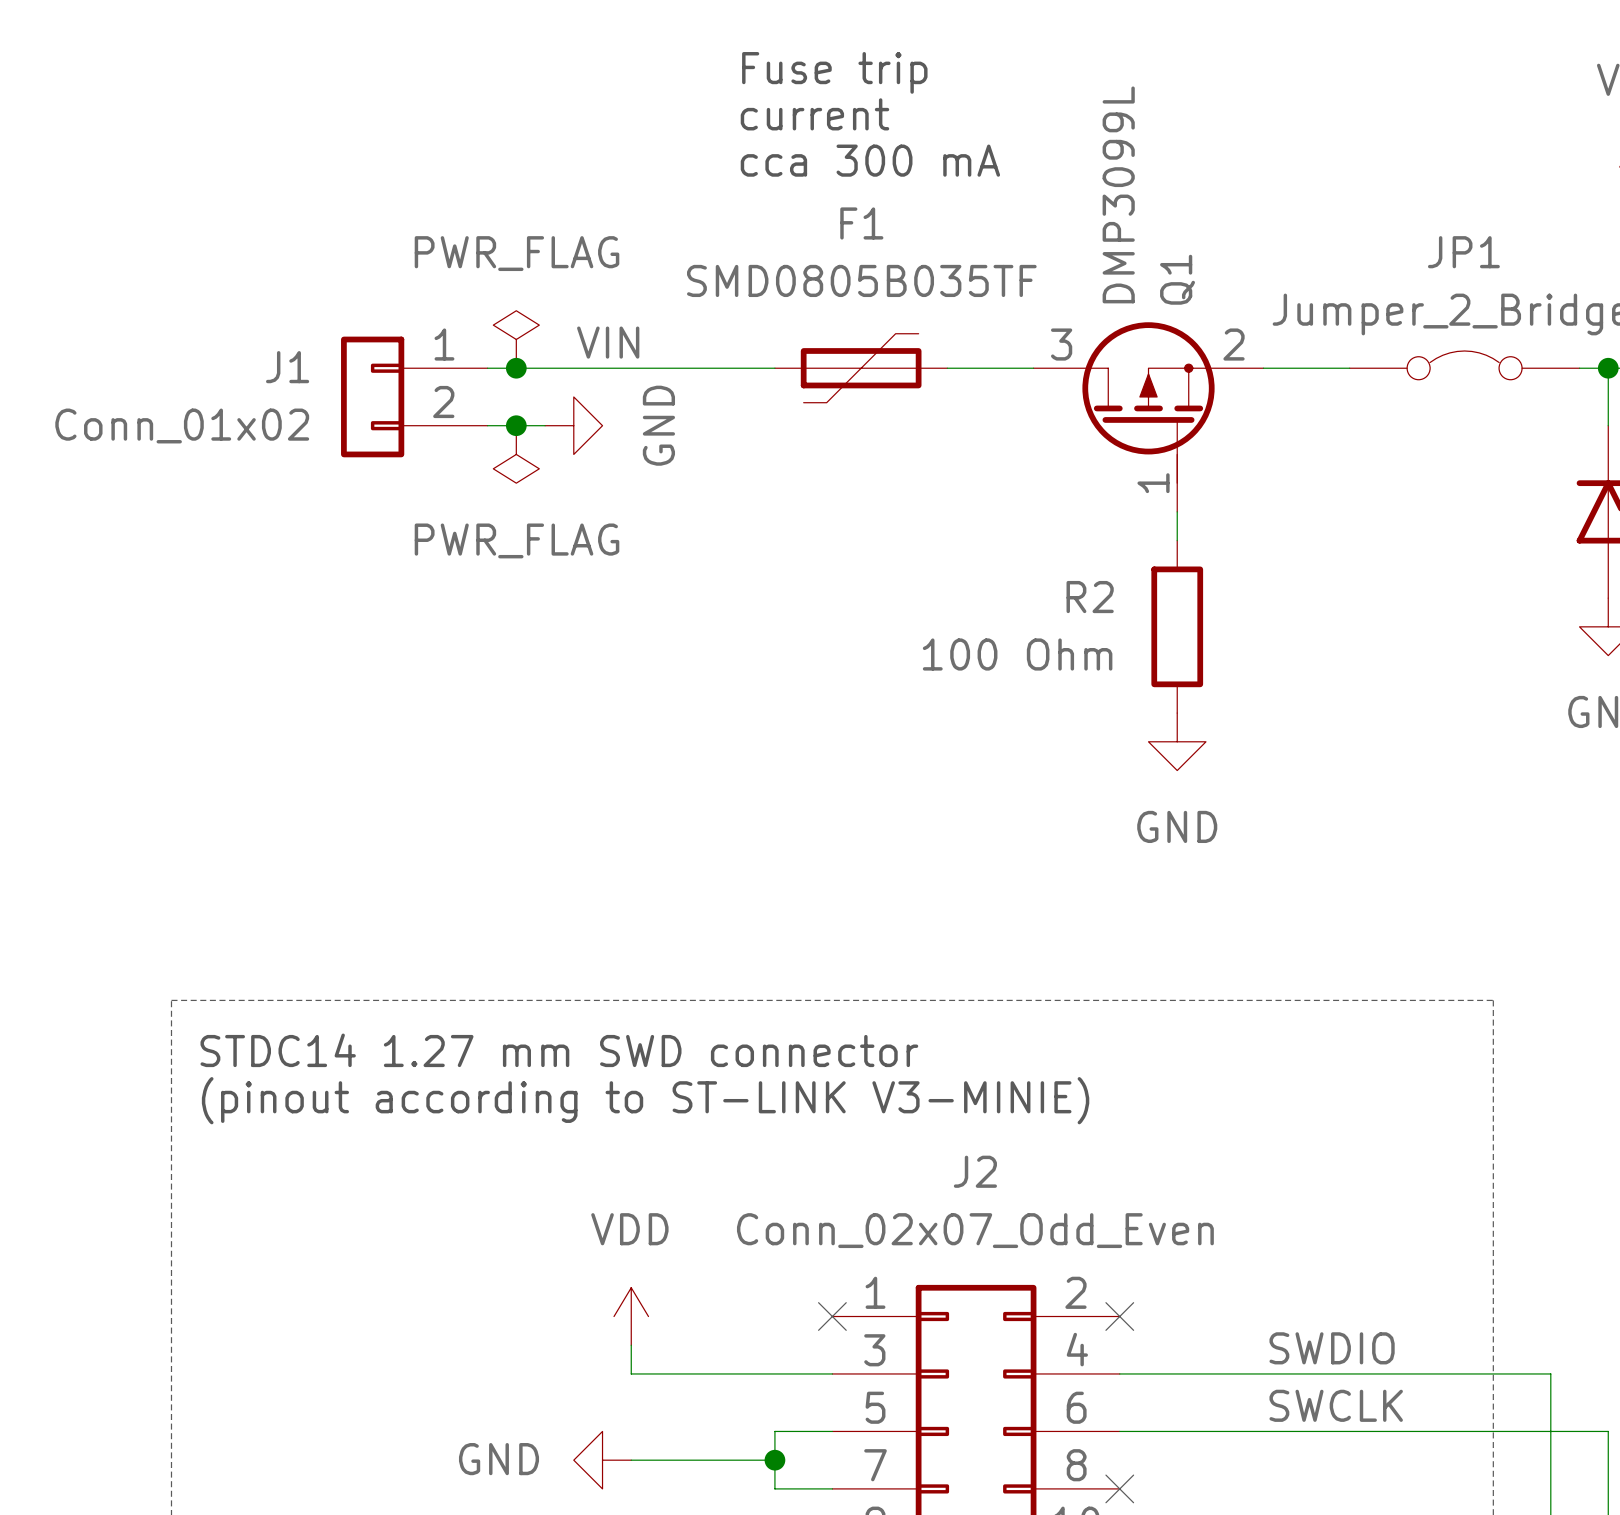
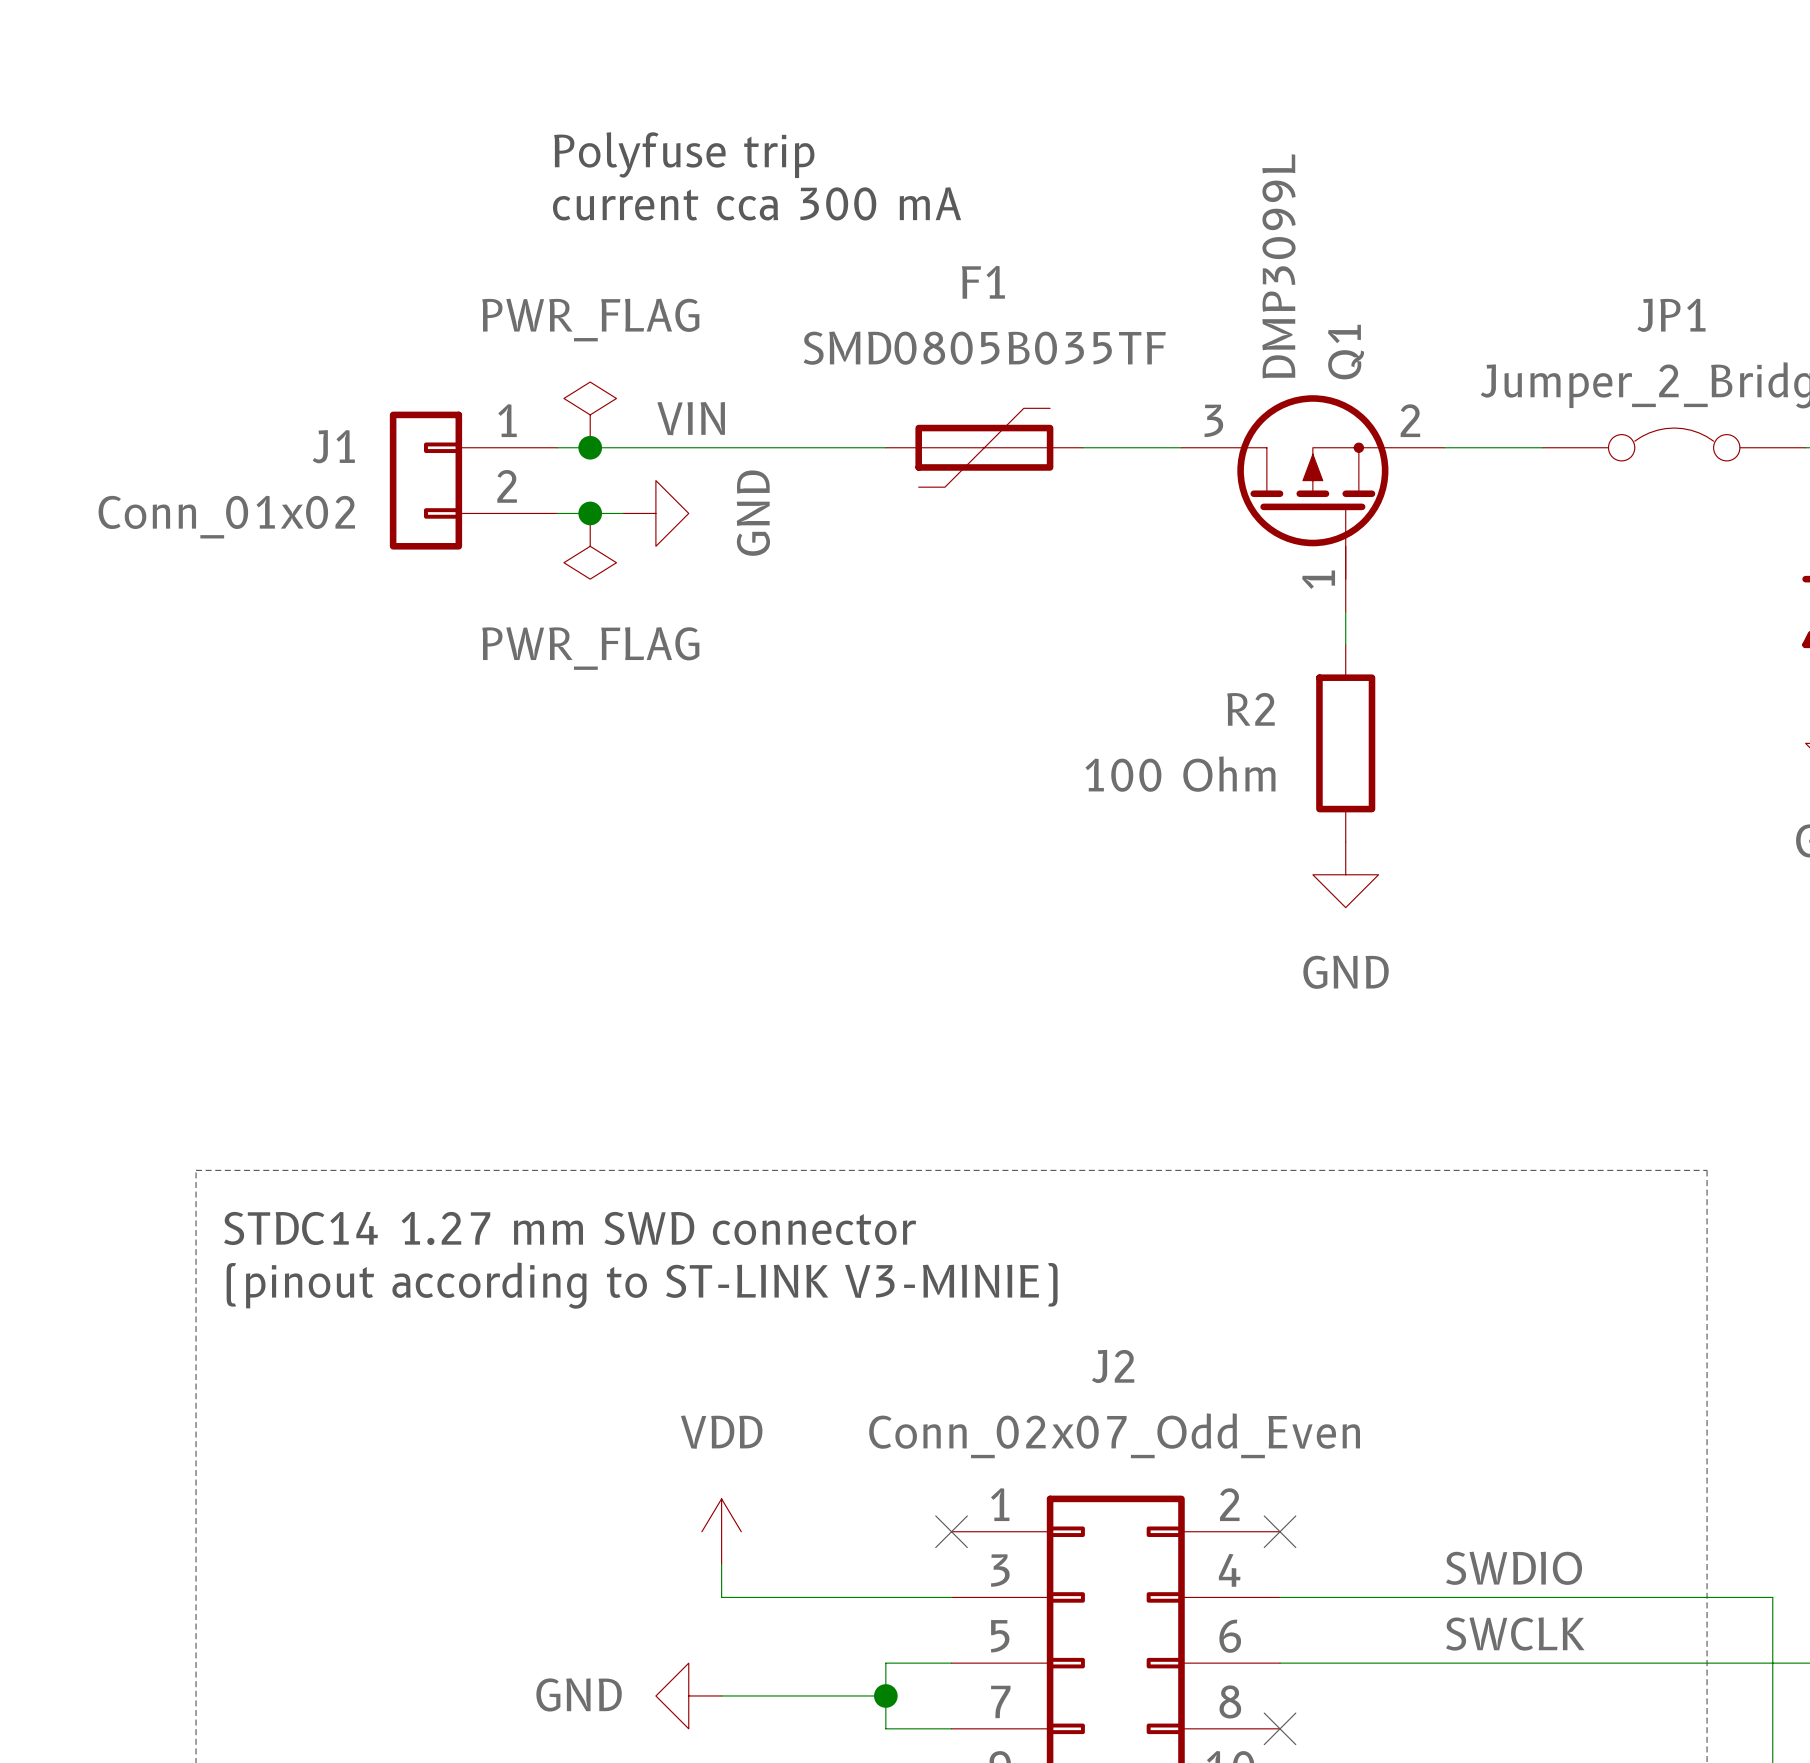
text: Fuse trip (834, 72) -> Polyfuse trip (684, 155)
text: current (814, 114) -> none
text: cca 300 mA (870, 160) -> current cca 300 mA (757, 203)

